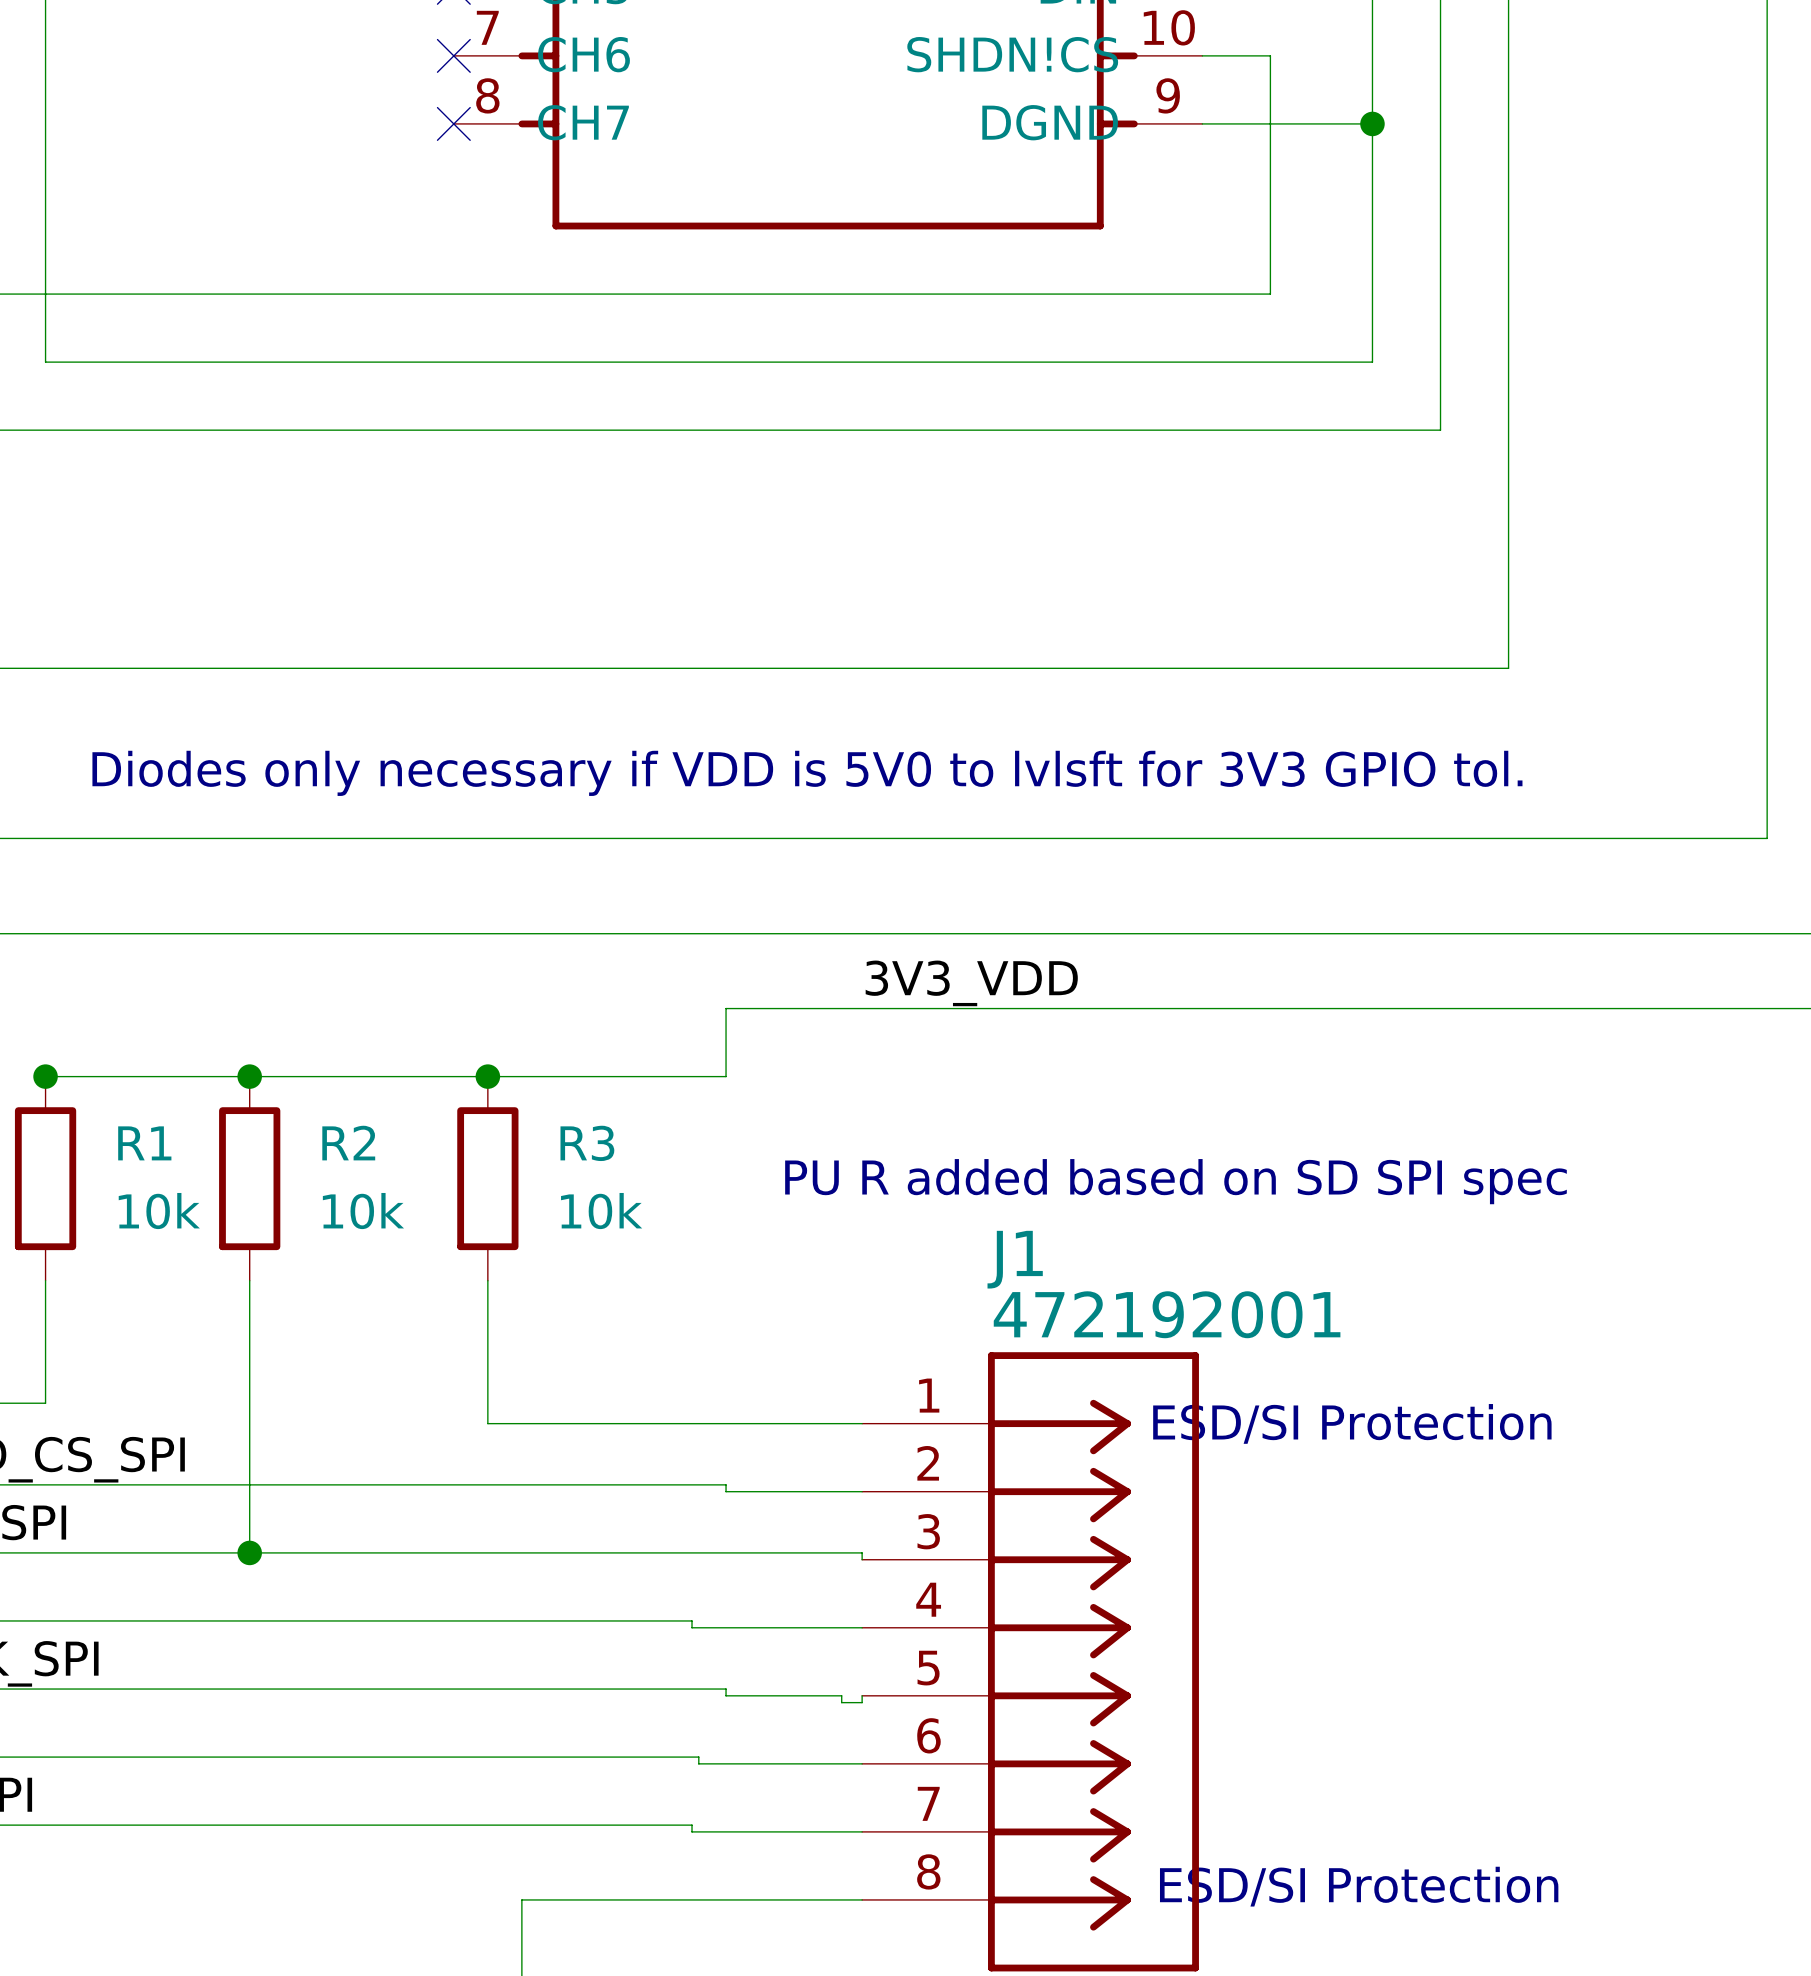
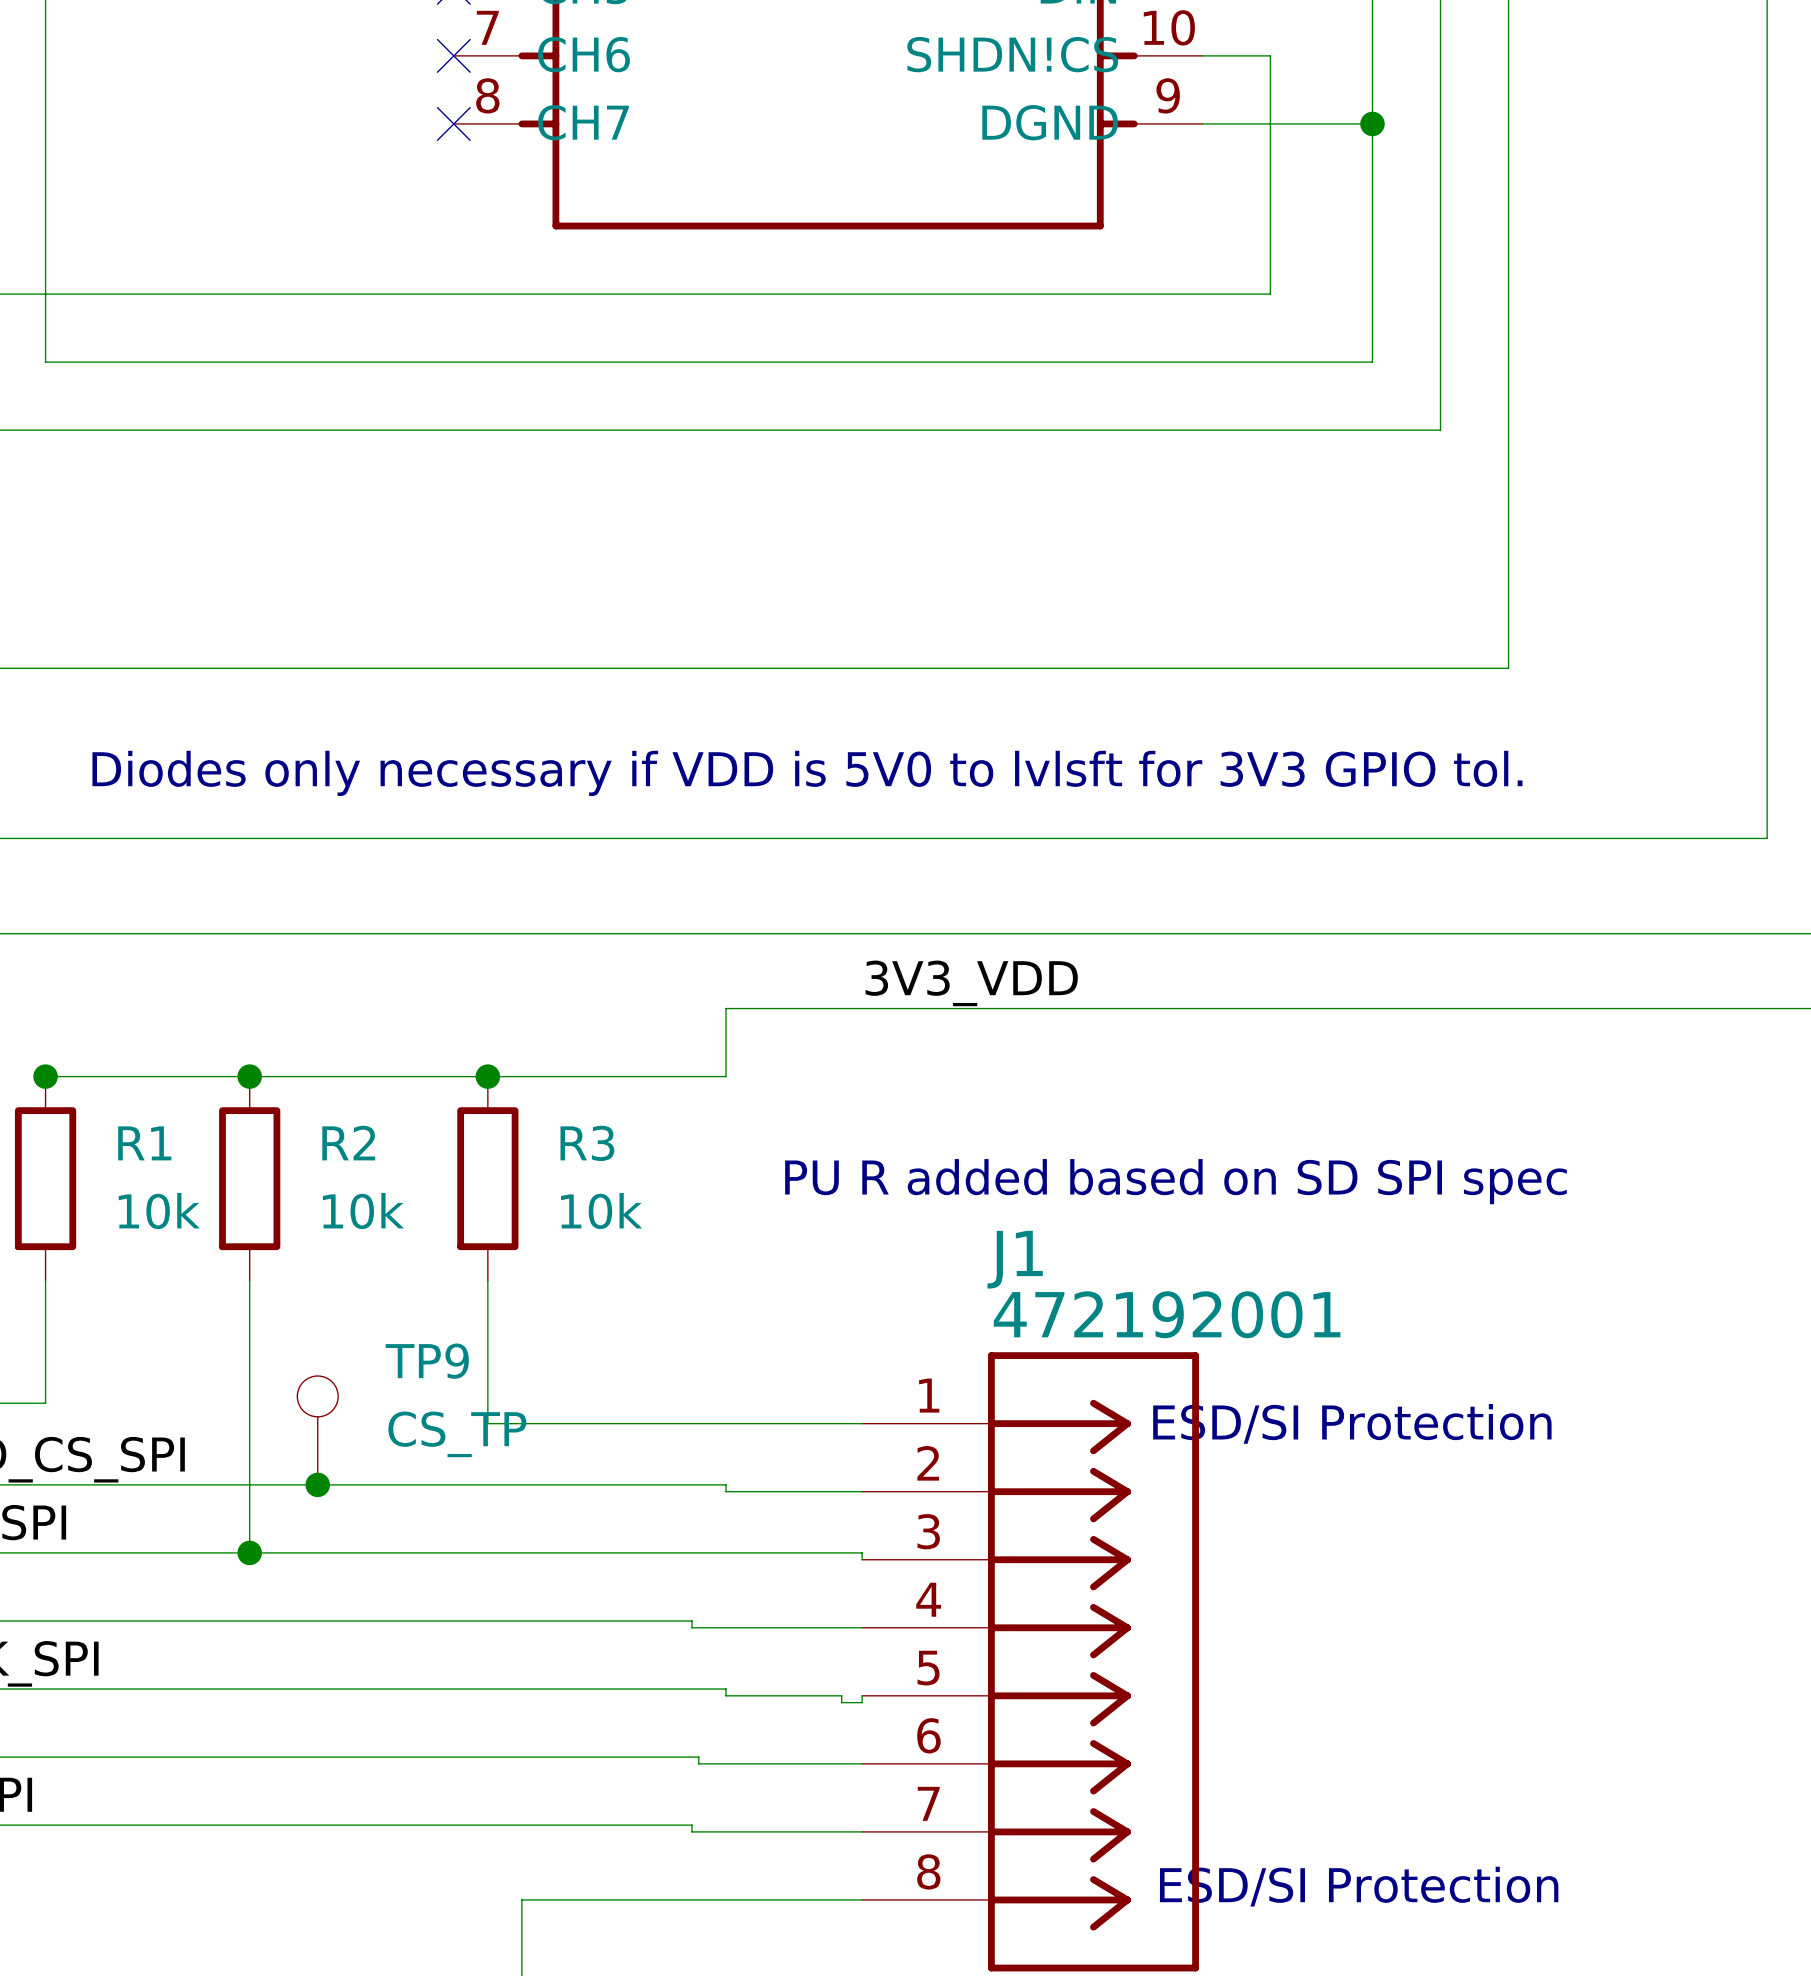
TP9: none -> CS_TP (317, 1430)
junction: none -> (317, 1484)

